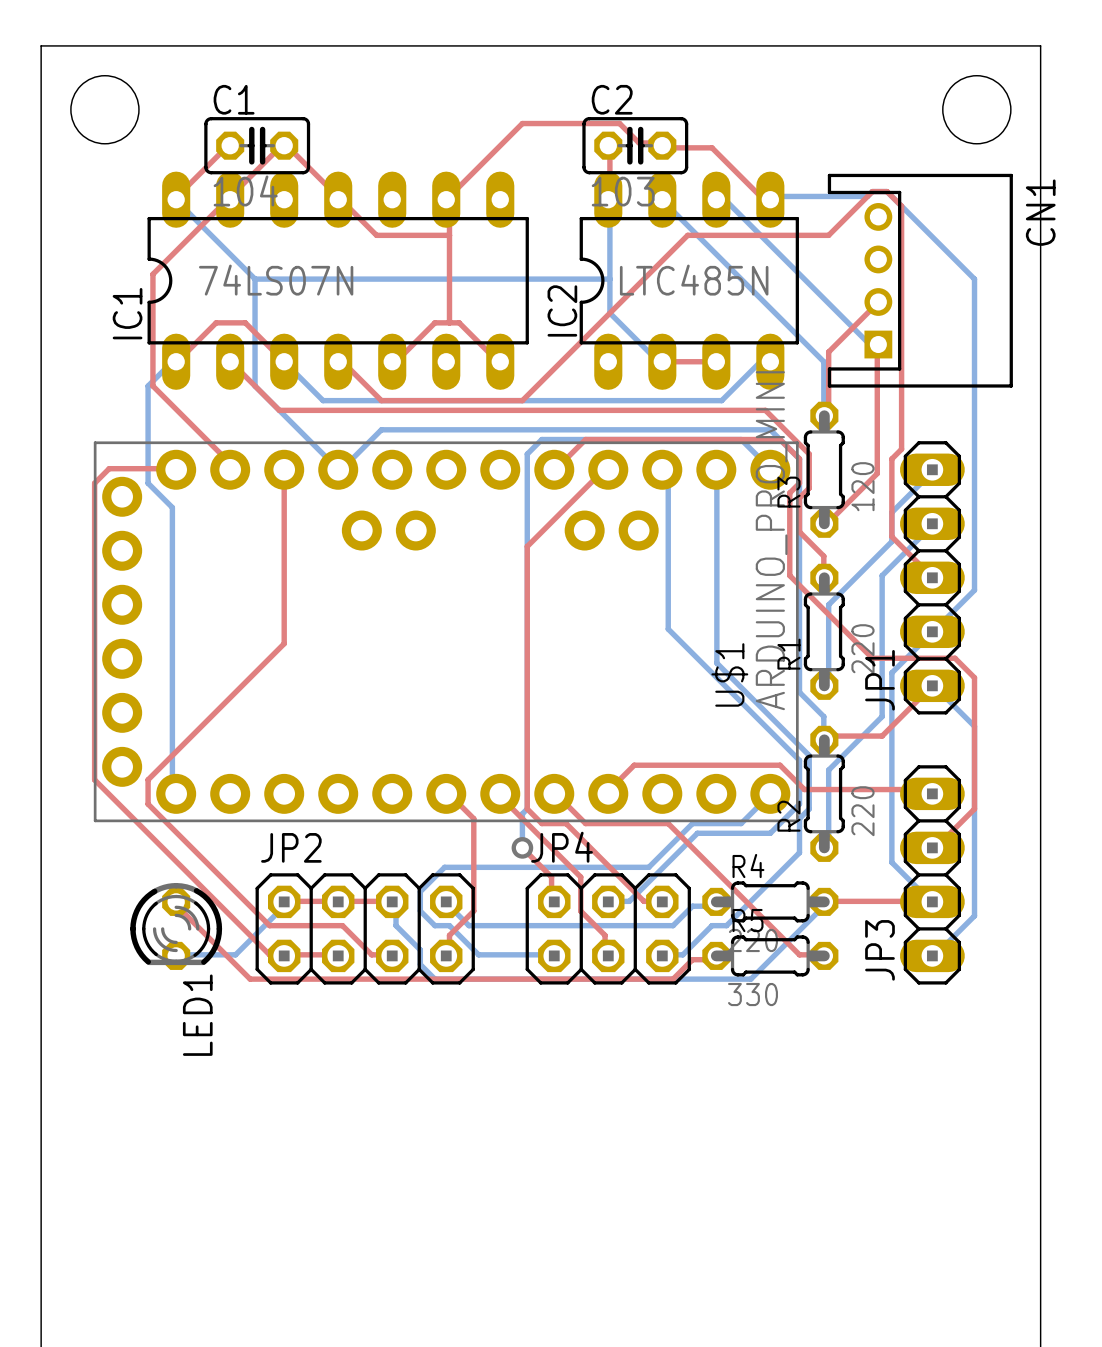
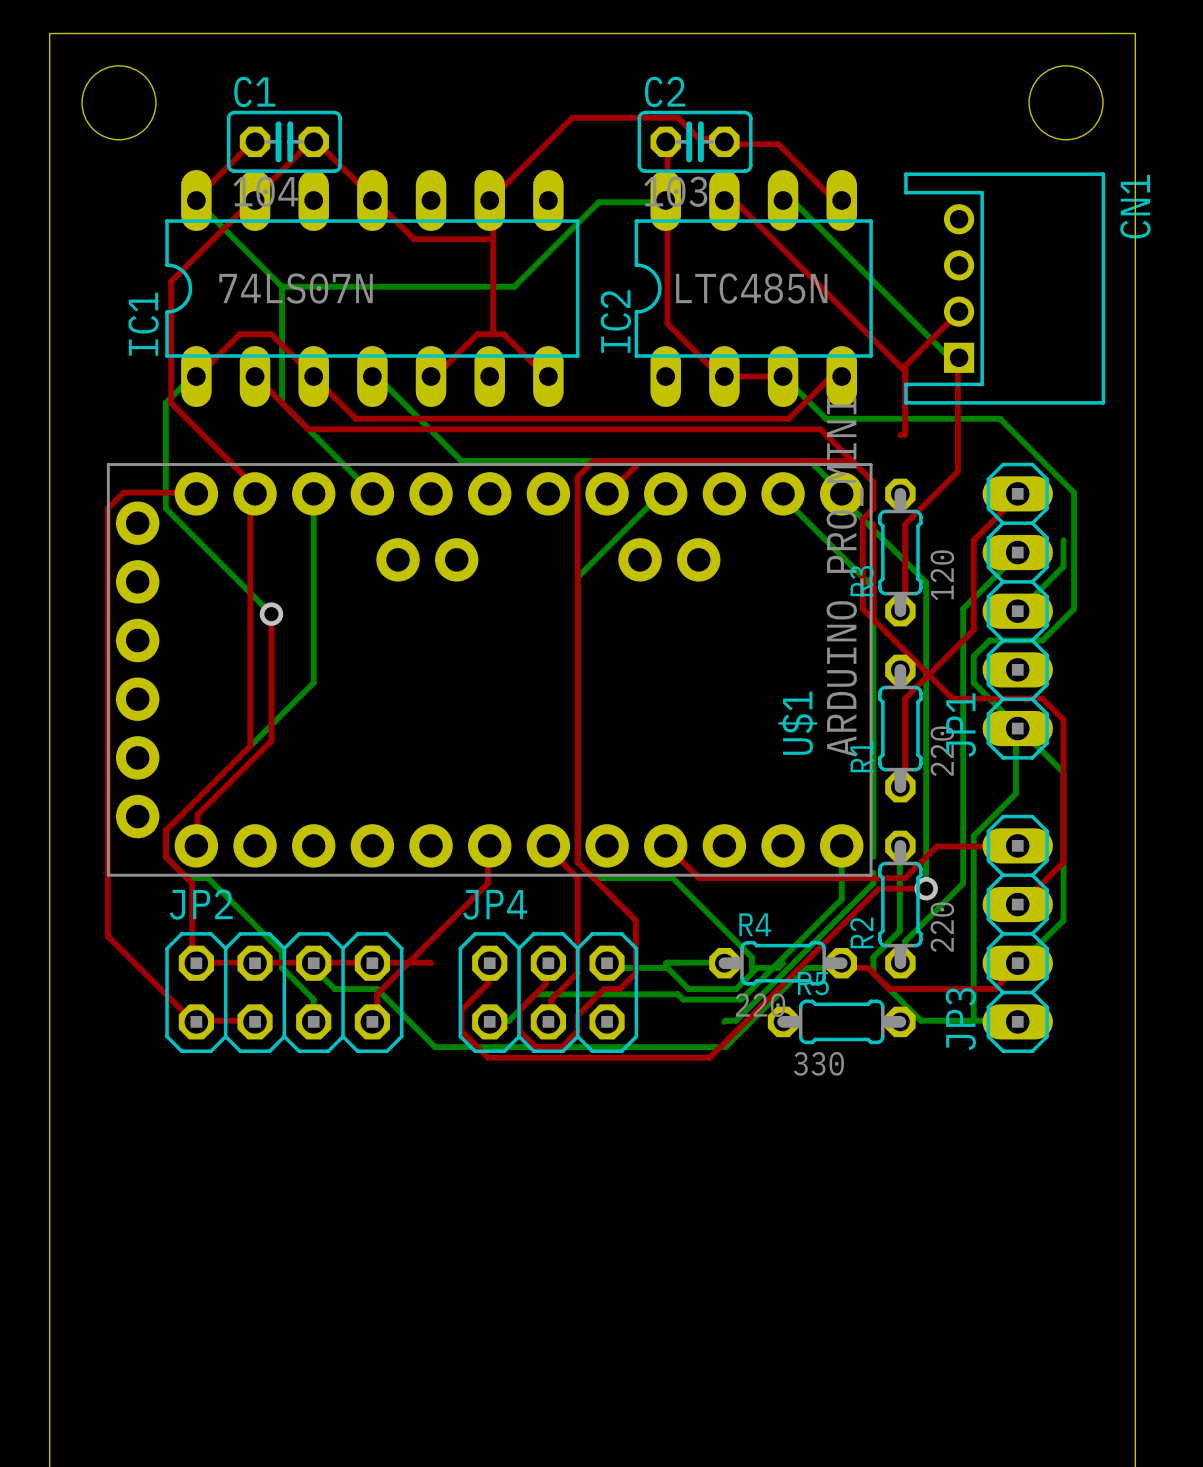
top track: none -> (665, 200) (667, 202) (667, 323) (720, 376) (724, 376)
bottom track: (608, 199) (609, 201) (609, 313) (658, 361) (662, 361) -> none
top track: none -> (724, 200) (725, 202) (736, 202) (905, 371)
bottom track: (662, 199) (823, 361) (824, 415) -> none
bottom track: (770, 199) (770, 196) (867, 196) (872, 191) (887, 191) (974, 279) (974, 512) -> none
bottom track: (468, 279) (609, 279) -> (514, 286) (598, 202) (662, 202) (665, 200)
bottom track: (284, 361) (323, 400) (721, 400) (760, 361) (770, 361) -> none
top track: (338, 361) (342, 361) (381, 400) -> (313, 376) (355, 418) (419, 418)
bottom track: none -> (372, 376) (377, 376) (461, 461) (593, 461)
bottom track: none -> (783, 376) (825, 418) (1000, 418) (1074, 492) (1074, 608) (1042, 640) (989, 640) (973, 656) (973, 682) (1017, 728) (1015, 730) (1015, 793) (973, 835)
top track: (522, 400) (687, 235) (828, 235) (872, 191) (887, 191) (901, 206) (901, 449) (891, 458) (891, 512) -> (572, 418) (788, 418) (831, 376) (841, 376)
top track: (750, 410) (765, 410) (809, 454) (809, 488) (799, 497) -> (820, 429) (852, 461)
bottom track: (541, 439) (527, 454) (527, 546) -> (665, 493) (662, 492) (577, 577)
top track: (877, 449) (877, 473) (828, 522) (824, 523) -> (957, 471) (905, 524) (905, 608) (900, 611)
top track: (284, 469) (284, 643) (225, 702) -> (255, 493) (250, 497) (250, 746)
bottom track: none -> (313, 493) (313, 682) (165, 830) (165, 857) (186, 878) (208, 878) (282, 952) (282, 967) (313, 999) (313, 1021)
bottom track: (338, 469) (342, 468) (381, 429) (770, 429) (799, 458) (799, 556) -> none
top track: (608, 469) (605, 468) (527, 546) -> (641, 461) (593, 461) (577, 476) (577, 577)
bottom track: (662, 469) (668, 478) (668, 629) (799, 760) -> none
bottom track: none -> (841, 493) (841, 497) (926, 582) (926, 888)
R3 position: (824, 469) -> (900, 552)
top track: none -> (1017, 493) (1015, 497) (973, 540)
bottom track: (932, 469) (891, 512) (891, 541) (828, 604) (828, 682) (824, 685) -> none
bottom track: (716, 473) (716, 663) (809, 755) (809, 808) (799, 818) -> (783, 497) (873, 587)
bottom track: (172, 507) (172, 789) (176, 793) -> (192, 534) (271, 614)
top track: (799, 531) (823, 556) (824, 577) -> (873, 561) (873, 619)
top track: (891, 536) (932, 577) -> none
bottom track: (974, 536) (974, 590) (891, 672) (891, 784) -> (1063, 566) (1017, 611)
top track: none -> (271, 614) (271, 740) (197, 814) (196, 845)
via: none -> (271, 614)
R1 position: (824, 631) -> (900, 728)
top track: (932, 685) (882, 736) (828, 736) -> (973, 566) (973, 629) (905, 698) (905, 783)
bottom track: (799, 692) (823, 716) (824, 739) -> (873, 735) (873, 809)
bottom track: (882, 716) (828, 770) (828, 847) (824, 847) -> (963, 761) (963, 883) (905, 941) (905, 962) (900, 963)
top track: (94, 779) (269, 954) (338, 955) -> (107, 830) (107, 936) (192, 1020) (255, 1021)
top track: (446, 793) (449, 794) (473, 818) (473, 911) (449, 935) (449, 954) (446, 955) -> (489, 845) (487, 846) (487, 883) (377, 994) (377, 1020) (372, 1021)
top track: (554, 793) (585, 823) (639, 823) -> (665, 845) (699, 878)
top track: (608, 793) (609, 789) (634, 765) (780, 765) (804, 789) (930, 789) (932, 793) -> (730, 878) (905, 878) (936, 846) (1017, 845)
bottom track: none -> (900, 845) (899, 930) (873, 957) (873, 973) (920, 1020) (1017, 1021)
R2 position: (824, 793) -> (900, 904)
bottom track: (770, 794) (741, 823) (692, 823) (648, 867) (444, 867) (420, 891) (420, 911) (434, 925) (449, 925) (478, 954) (554, 955) -> (841, 846) (841, 899) (741, 999) (683, 999) (678, 994) (535, 994) (509, 1020) (489, 1021)
bottom track: (799, 804) (770, 833) (697, 833) (629, 901) -> (724, 963) (688, 962)
bottom track: (527, 808) (522, 813) (522, 847) -> (577, 862) (593, 878) (672, 878) (751, 957) (751, 973)
top track: (527, 823) (580, 877) -> (593, 878) (635, 920) (635, 936)
top track: none -> (577, 878) (577, 973) (551, 999) (551, 1020) (548, 1021)
top track: (541, 823) (566, 823) (643, 901) (662, 901) -> none
top track: (668, 823) (799, 954) (824, 955) -> none
top track: (172, 828) (269, 925) (342, 925) (371, 954) (392, 955) -> (192, 883) (192, 962) (313, 962)
bottom track: (799, 828) (799, 852) (726, 925) (712, 925) (682, 954) (673, 954) -> (873, 883) (736, 1020)
top track: none -> (926, 888) (878, 888) (709, 1057) (487, 1057) (461, 1031) (461, 1010) (487, 983) (489, 963)
via: none -> (926, 888)
top track: (522, 847) (551, 877) (551, 901) (554, 901) -> none
via: (522, 847) -> none
bottom track: (891, 862) (932, 901) -> (973, 920) (973, 1020)
bottom track: (974, 862) (974, 915) (932, 955) -> (1063, 920) (1021, 962) (1017, 963)
top track: (176, 901) (177, 906) (250, 979) (488, 979) -> (548, 963) (546, 967) (546, 983) (519, 1010) (519, 1031) (535, 1047)
bottom track: (392, 901) (396, 906) (396, 925) (420, 949) (420, 964) (434, 979) -> (313, 967) (334, 989) (377, 989) (435, 1047) (477, 1047)
bottom track: (446, 901) (468, 925) (629, 925) -> (607, 963) (609, 967) (667, 967) (688, 989)
R4 position: (770, 901) -> (783, 963)
top track: (824, 901) (932, 901) -> (841, 963) (841, 967) (868, 967) (889, 989) (994, 989) (1015, 967) (1017, 963)
bottom track: (824, 901) (823, 906) (750, 979) (663, 979) -> (841, 963) (841, 967) (804, 967) (725, 1047)
bottom track: (284, 906) (235, 954) (176, 955) -> none
top track: (580, 911) (605, 935) (605, 954) (608, 955) -> (635, 973) (619, 989) (604, 989) (577, 1015) (577, 1031) (561, 1047)
LED1: (176, 926) -> none
JP2 position: (365, 928) -> (284, 992)
JP4 position: (608, 928) -> (548, 992)
top track: (716, 955) (712, 959) (692, 959) (673, 979) (512, 979) -> none

